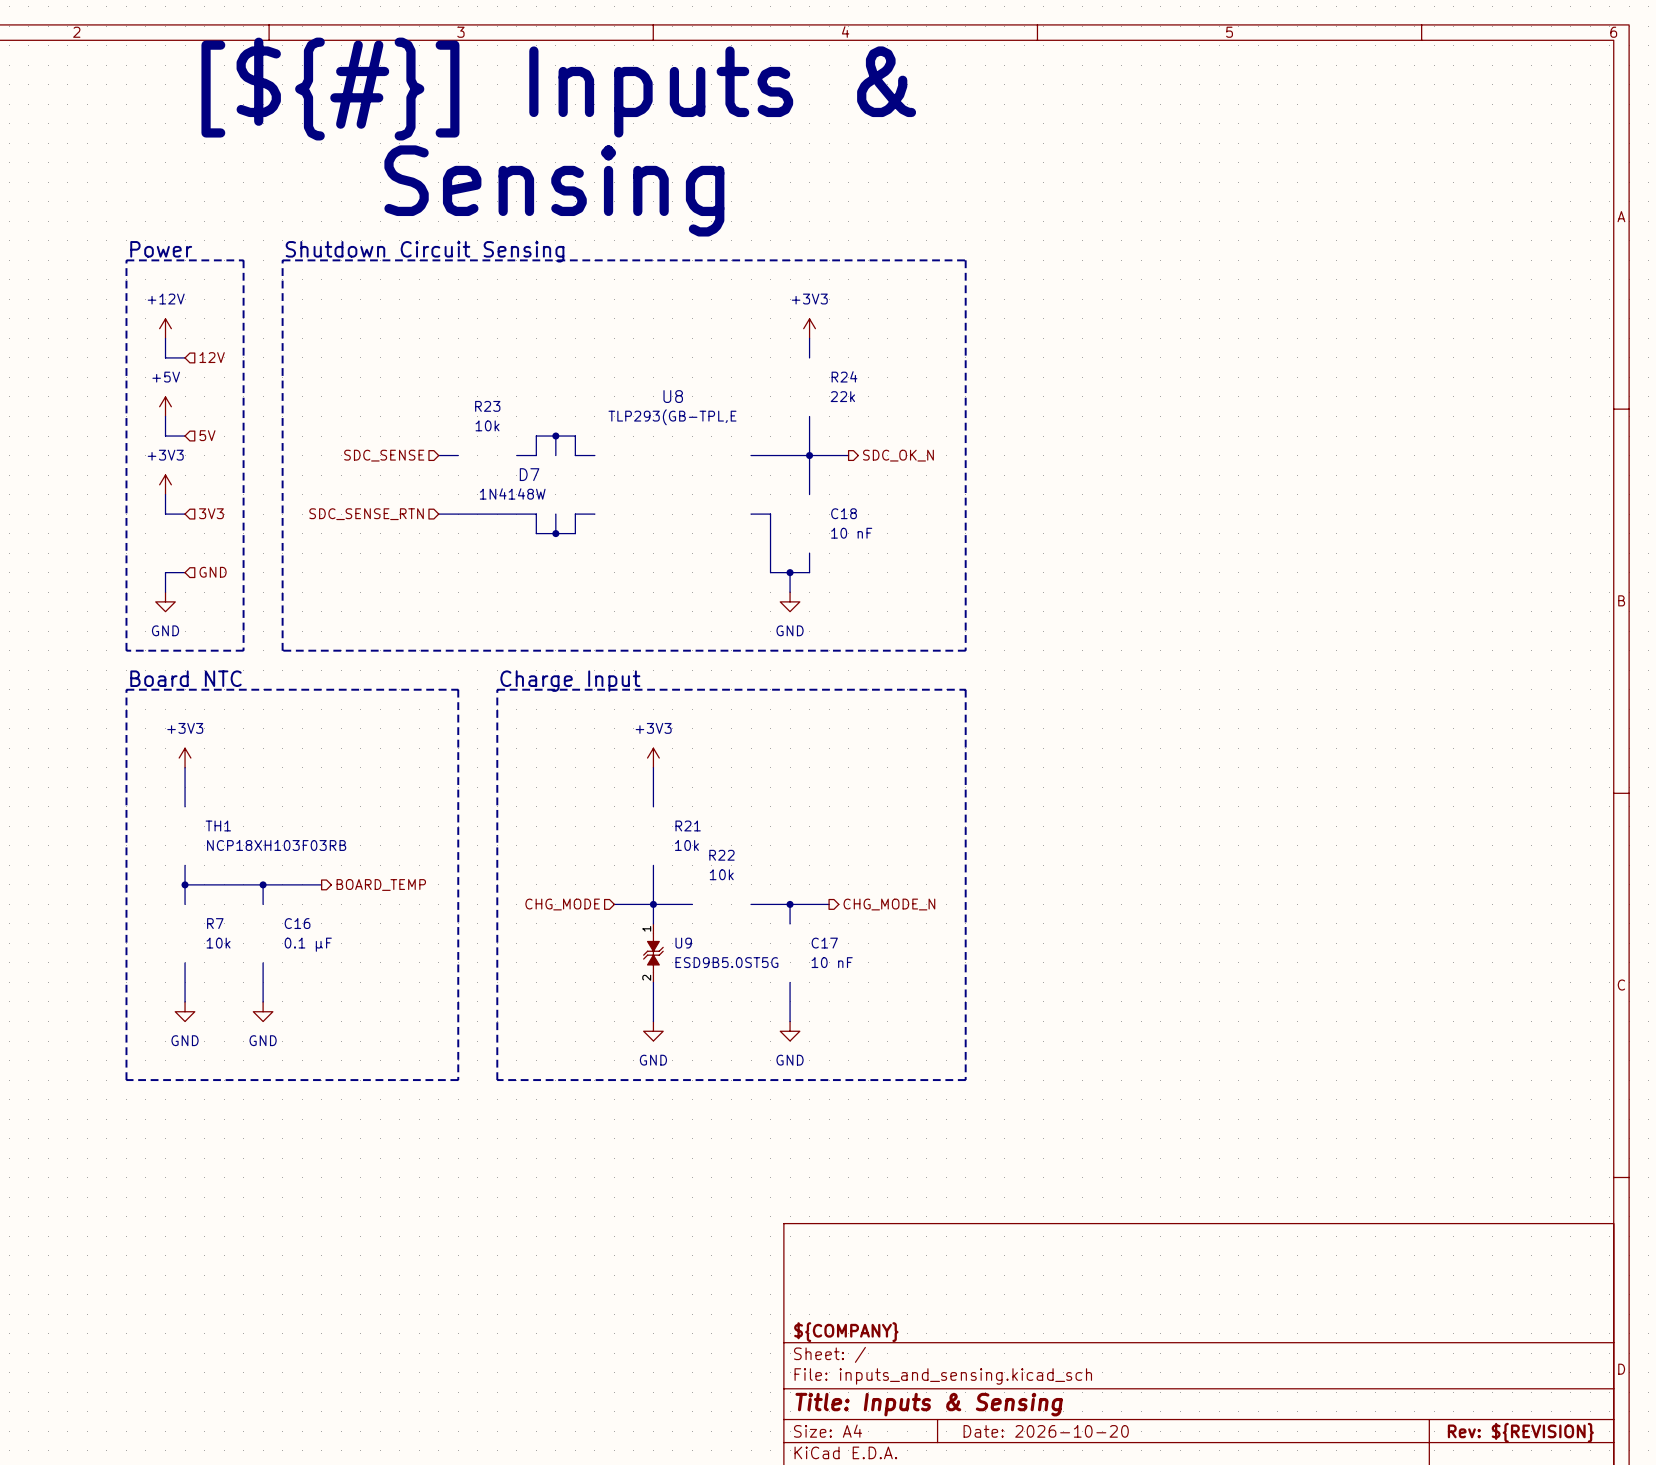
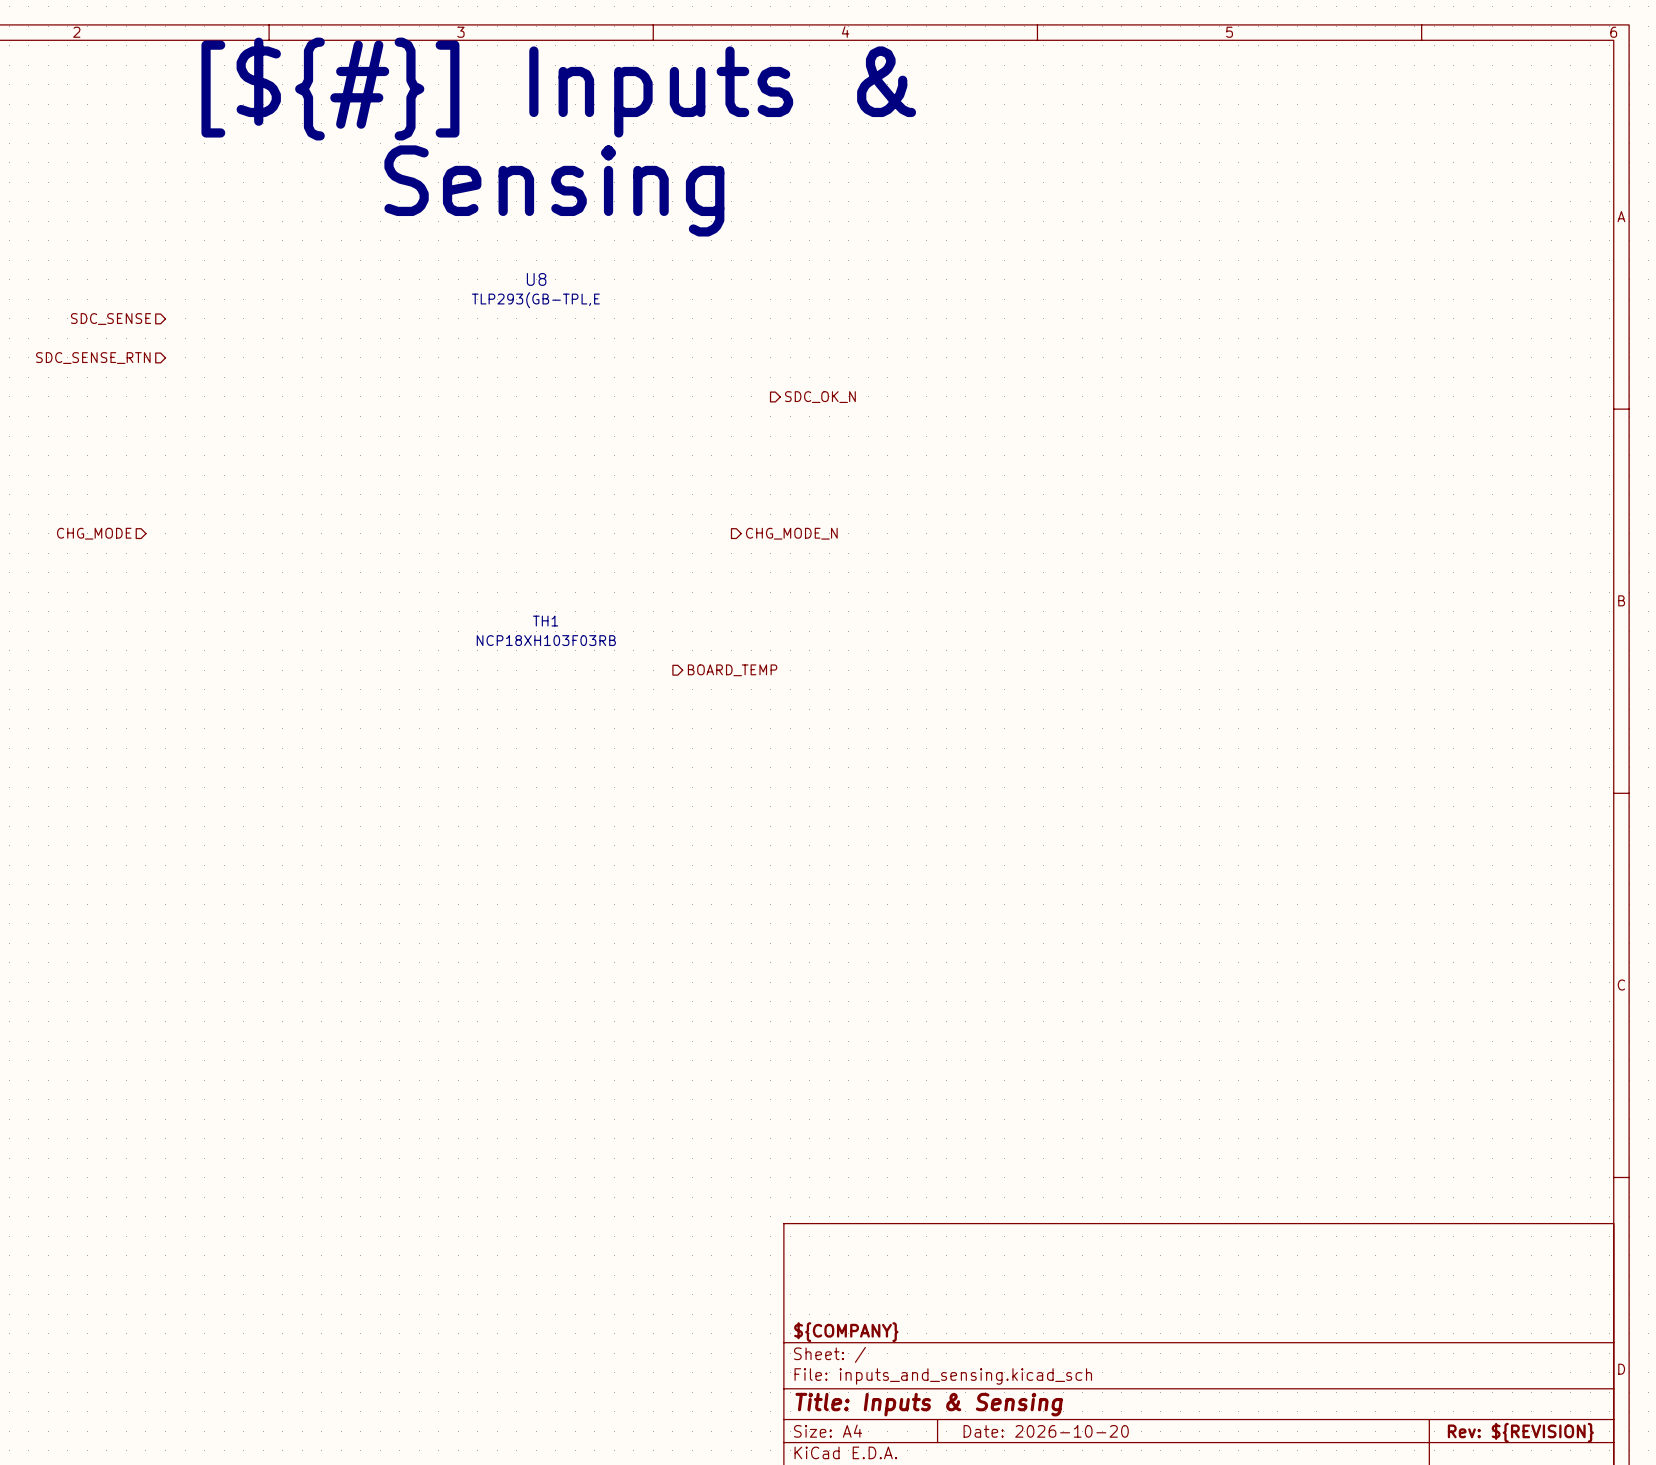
text: Power (161, 249) -> none
text: Shutdown Circuit Sensing (425, 251) -> none
line: (126, 260) (243, 260) (243, 650) (126, 650) (126, 260) -> none
line: (282, 260) (965, 260) (965, 650) (282, 650) (282, 260) -> none
hierarchical label: none -> SDC_SENSE (110, 319)
power symbol: +12V (165, 328) -> none
power symbol: +3V3 (809, 328) -> none
wire: (165, 338) (165, 357) (185, 357) -> none
wire: (809, 338) (809, 357) -> none
hierarchical label: 12V (212, 357) -> none
hierarchical label: none -> SDC_SENSE_RTN (93, 358)
R24: 22k (844, 386) -> none
power symbol: +5V (165, 406) -> none
U8 position: (672, 407) -> (535, 290)
wire: (165, 416) (165, 436) (185, 436) -> none
R23: 10k (487, 416) -> none
wire: (809, 416) (809, 494) -> none
hierarchical label: 5V (207, 435) -> none
wire: (555, 436) (555, 455) -> none
junction: (555, 436) -> none
hierarchical label: SDC_SENSE (384, 455) -> none
wire: (438, 455) (458, 455) -> none
wire: (516, 455) (536, 455) (536, 436) (575, 436) (575, 455) (594, 455) -> none
wire: (751, 455) (848, 455) -> none
junction: (809, 455) -> none
hierarchical label position: SDC_OK_N (898, 455) -> SDC_OK_N (820, 397)
D7: 1N4148W (512, 483) -> none
power symbol: +3V3 (165, 484) -> none
wire: (165, 494) (165, 514) (185, 514) -> none
hierarchical label: 3V3 (211, 513) -> none
hierarchical label: SDC_SENSE_RTN (366, 514) -> none
wire: (438, 514) (536, 514) (536, 533) (575, 533) (575, 514) (594, 514) -> none
wire: (555, 514) (555, 533) -> none
wire: (751, 514) (770, 514) (770, 572) (809, 572) (809, 553) -> none
C18: 10 nF (851, 523) -> none
hierarchical label: none -> CHG_MODE (94, 533)
junction: (555, 533) -> none
hierarchical label: none -> CHG_MODE_N (791, 533)
wire: (185, 572) (165, 572) (165, 592) -> none
hierarchical label: GND (213, 572) -> none
wire: (790, 572) (790, 592) -> none
junction: (790, 572) -> none
power symbol: GND (165, 601) -> none
power symbol: GND (790, 601) -> none
hierarchical label: none -> BOARD_TEMP (732, 670)
text: Board NTC (185, 678) -> none
text: Charge Input (570, 681) -> none
line: (126, 689) (126, 1080) (458, 1080) (458, 689) (126, 689) -> none
line: (497, 689) (965, 689) (965, 1080) (497, 1080) (497, 689) -> none
power symbol: +3V3 (185, 758) -> none
power symbol: +3V3 (653, 758) -> none
wire: (185, 767) (185, 806) -> none
wire: (653, 767) (653, 806) -> none
TH1 name position: TH1 (218, 825) -> TH1 (545, 621)
TH1 position: (275, 835) -> (546, 630)
R21: 10k (687, 835) -> none
wire: (185, 865) (185, 904) -> none
wire: (653, 865) (653, 923) -> none
R22: 10k (721, 865) -> none
wire: (185, 884) (321, 884) -> none
junction: (185, 884) -> none
wire: (263, 884) (263, 904) -> none
junction: (263, 884) -> none
hierarchical label: BOARD_TEMP (381, 884) -> none
hierarchical label: CHG_MODE (562, 904) -> none
wire: (614, 904) (692, 904) -> none
junction: (653, 904) -> none
wire: (751, 904) (829, 904) -> none
wire: (790, 904) (790, 923) -> none
junction: (790, 904) -> none
hierarchical label: CHG_MODE_N (889, 904) -> none
R7: 10k (218, 933) -> none
C16: 0.1 µF (308, 934) -> none
C17: 10 nF (832, 952) -> none
U9: ESD9B5.0ST5G (653, 953) -> none
wire: (185, 962) (185, 1001) -> none
wire: (263, 962) (263, 1001) -> none
wire: (653, 982) (653, 1021) -> none
wire: (790, 982) (790, 1021) -> none
power symbol: GND (185, 1011) -> none
power symbol: GND (263, 1011) -> none
power symbol: GND (653, 1031) -> none
power symbol: GND (790, 1031) -> none

